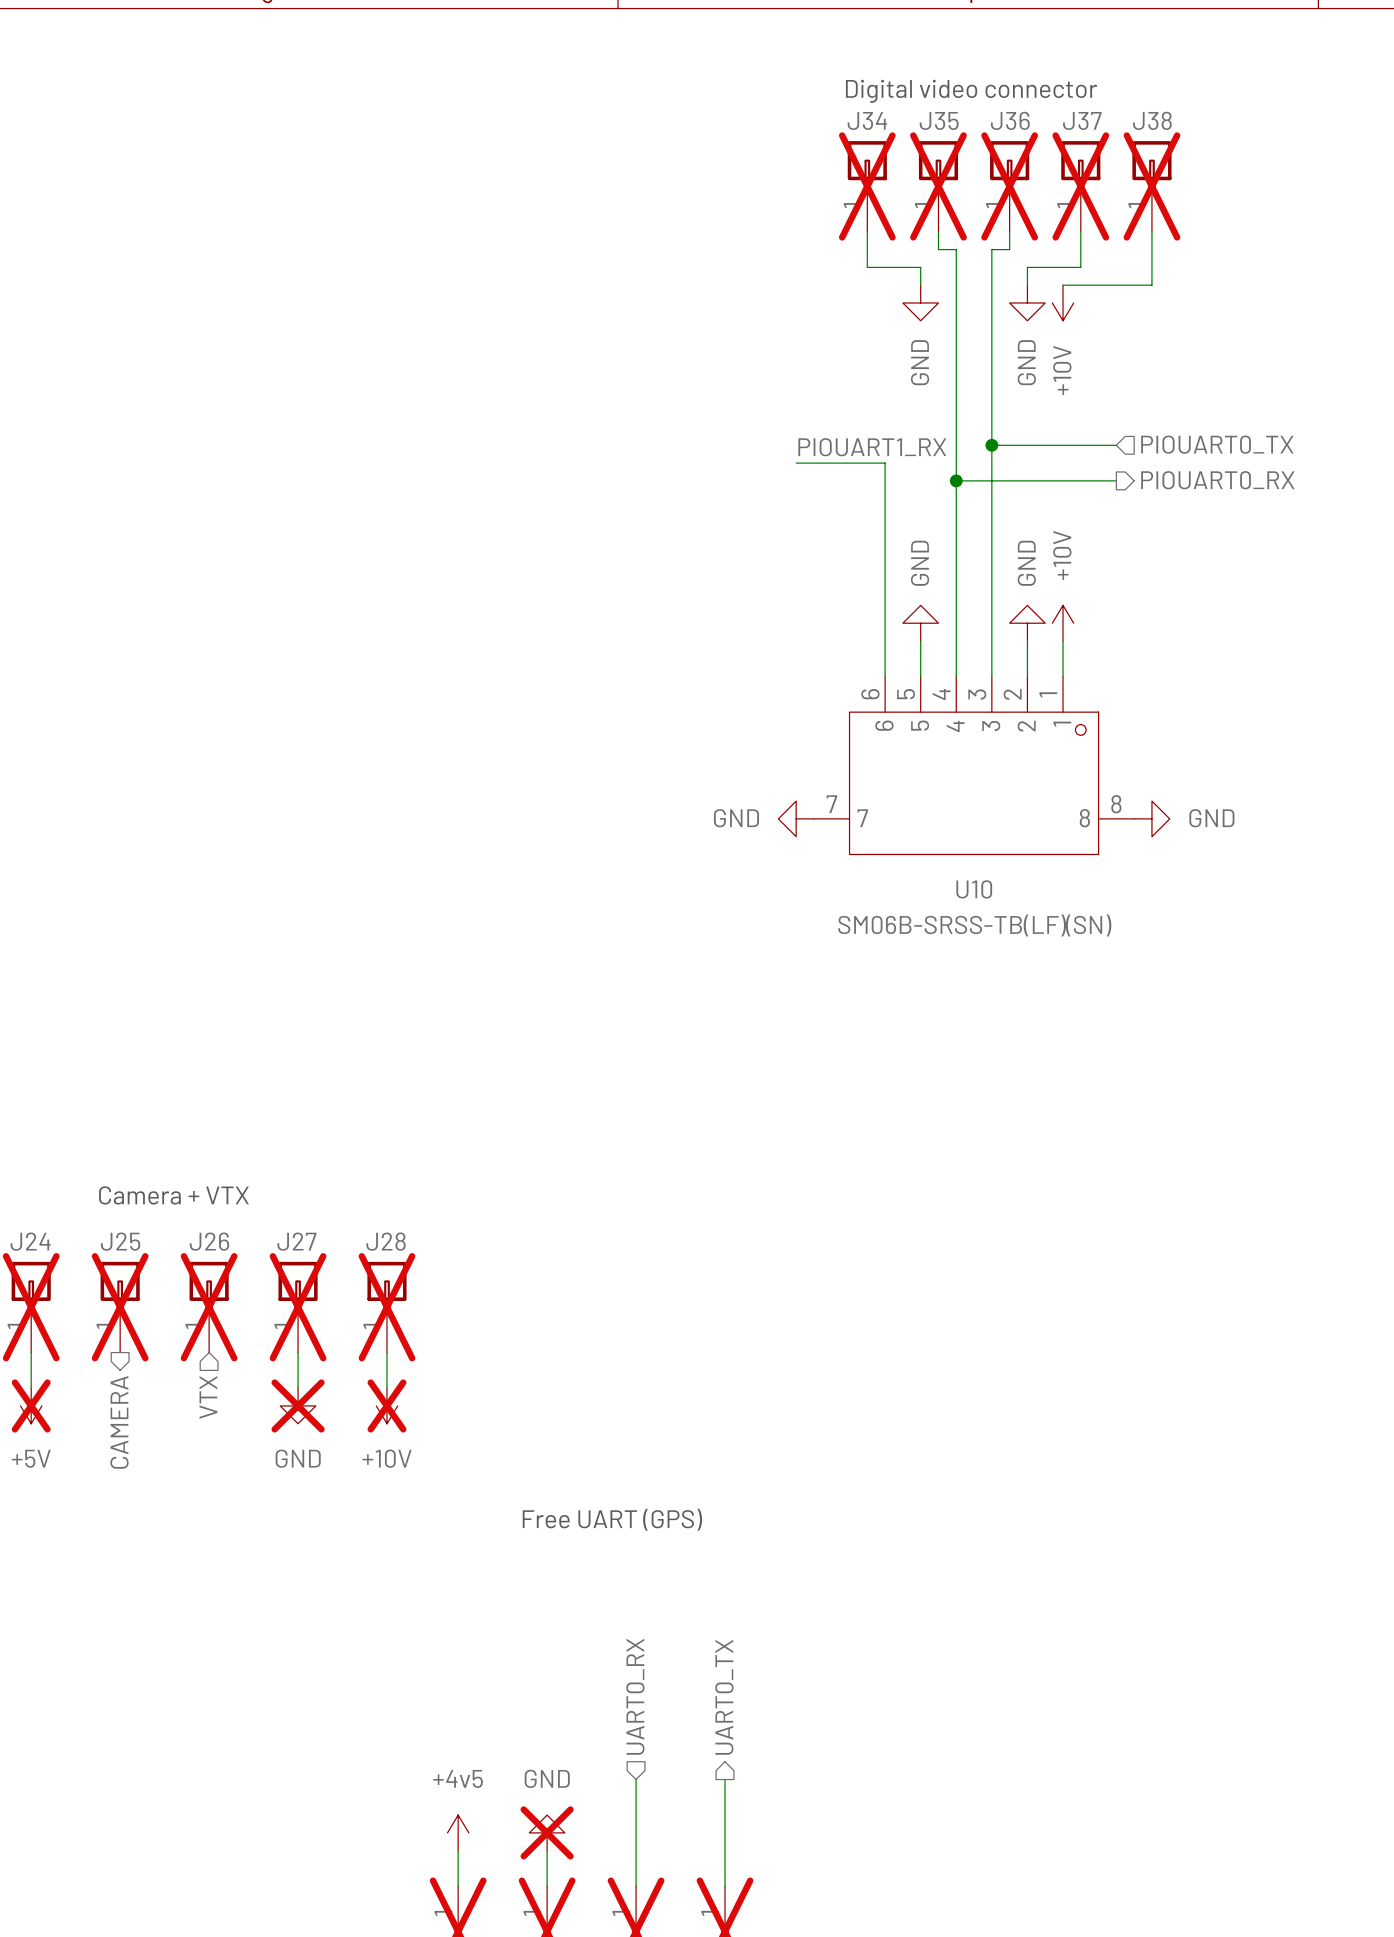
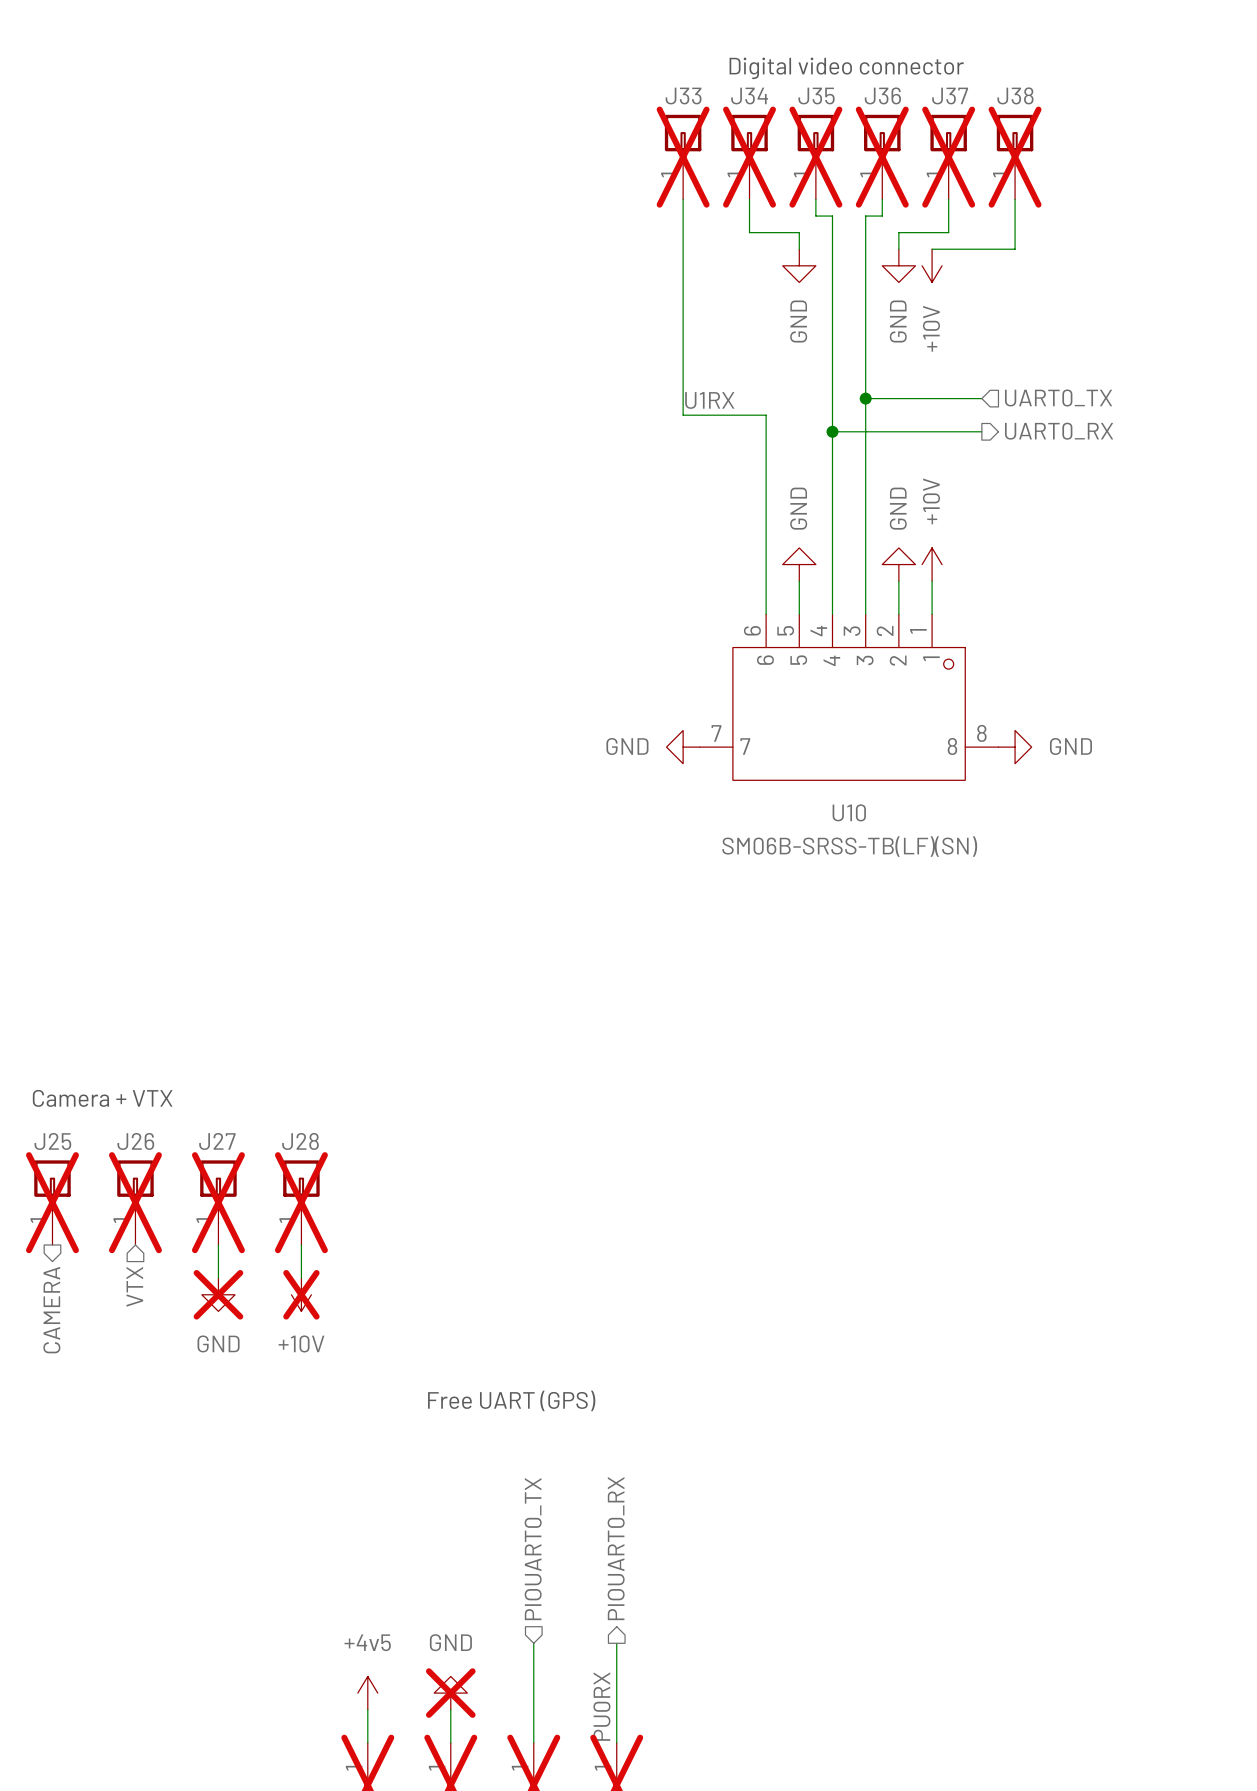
J33: none -> (683, 157)
wire: none -> (683, 199) (683, 415)
hierarchical label: PIOUART0_TX (1217, 444) -> UART0_TX (1058, 397)
label: PIOUART1_RX (872, 447) -> U1RX (709, 400)
hierarchical label: PIOUART0_RX (1217, 480) -> UART0_RX (1059, 431)
hierarchical label: UART0_RX (635, 1696) -> PIOUART0_TX (533, 1549)
hierarchical label: UART0_TX (724, 1697) -> PIOUART0_RX (616, 1548)
label: none -> PU0RX (601, 1706)

